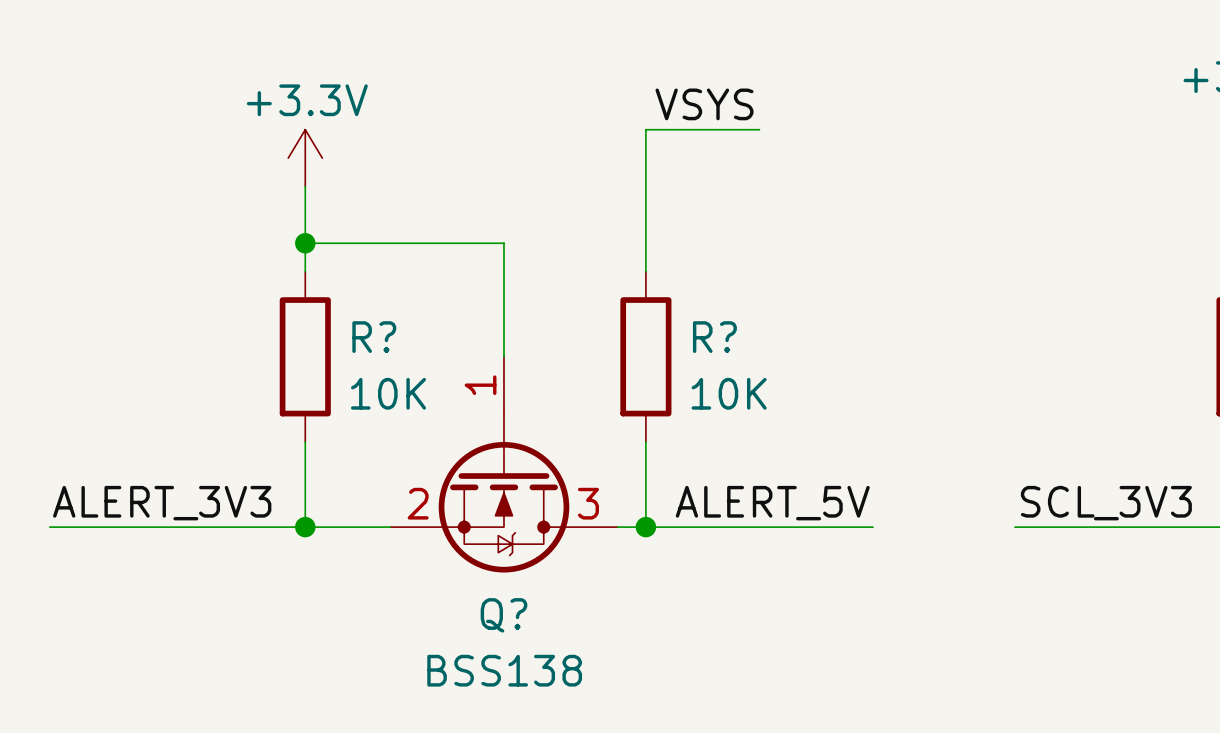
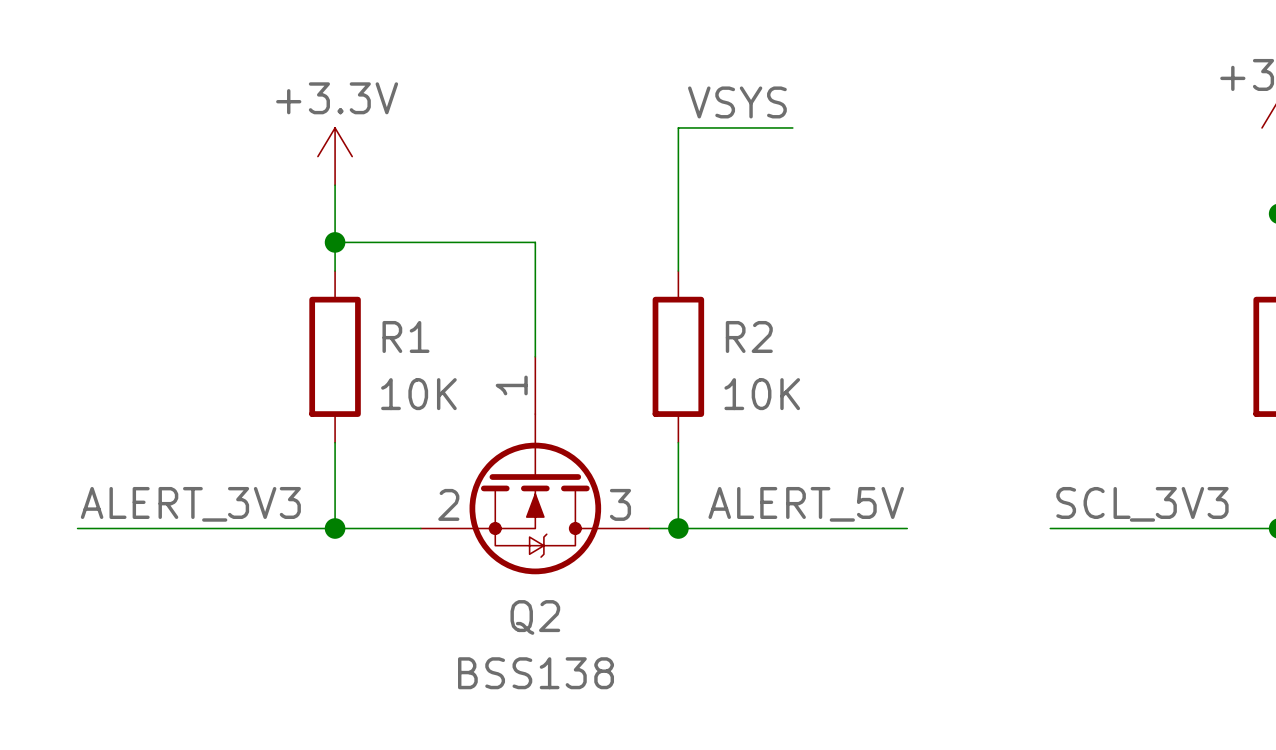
R? name: R? (374, 337) -> R1 (405, 336)
R? name: R? (714, 337) -> R2 (749, 336)
Q? name: Q? (503, 615) -> Q2 (535, 617)

